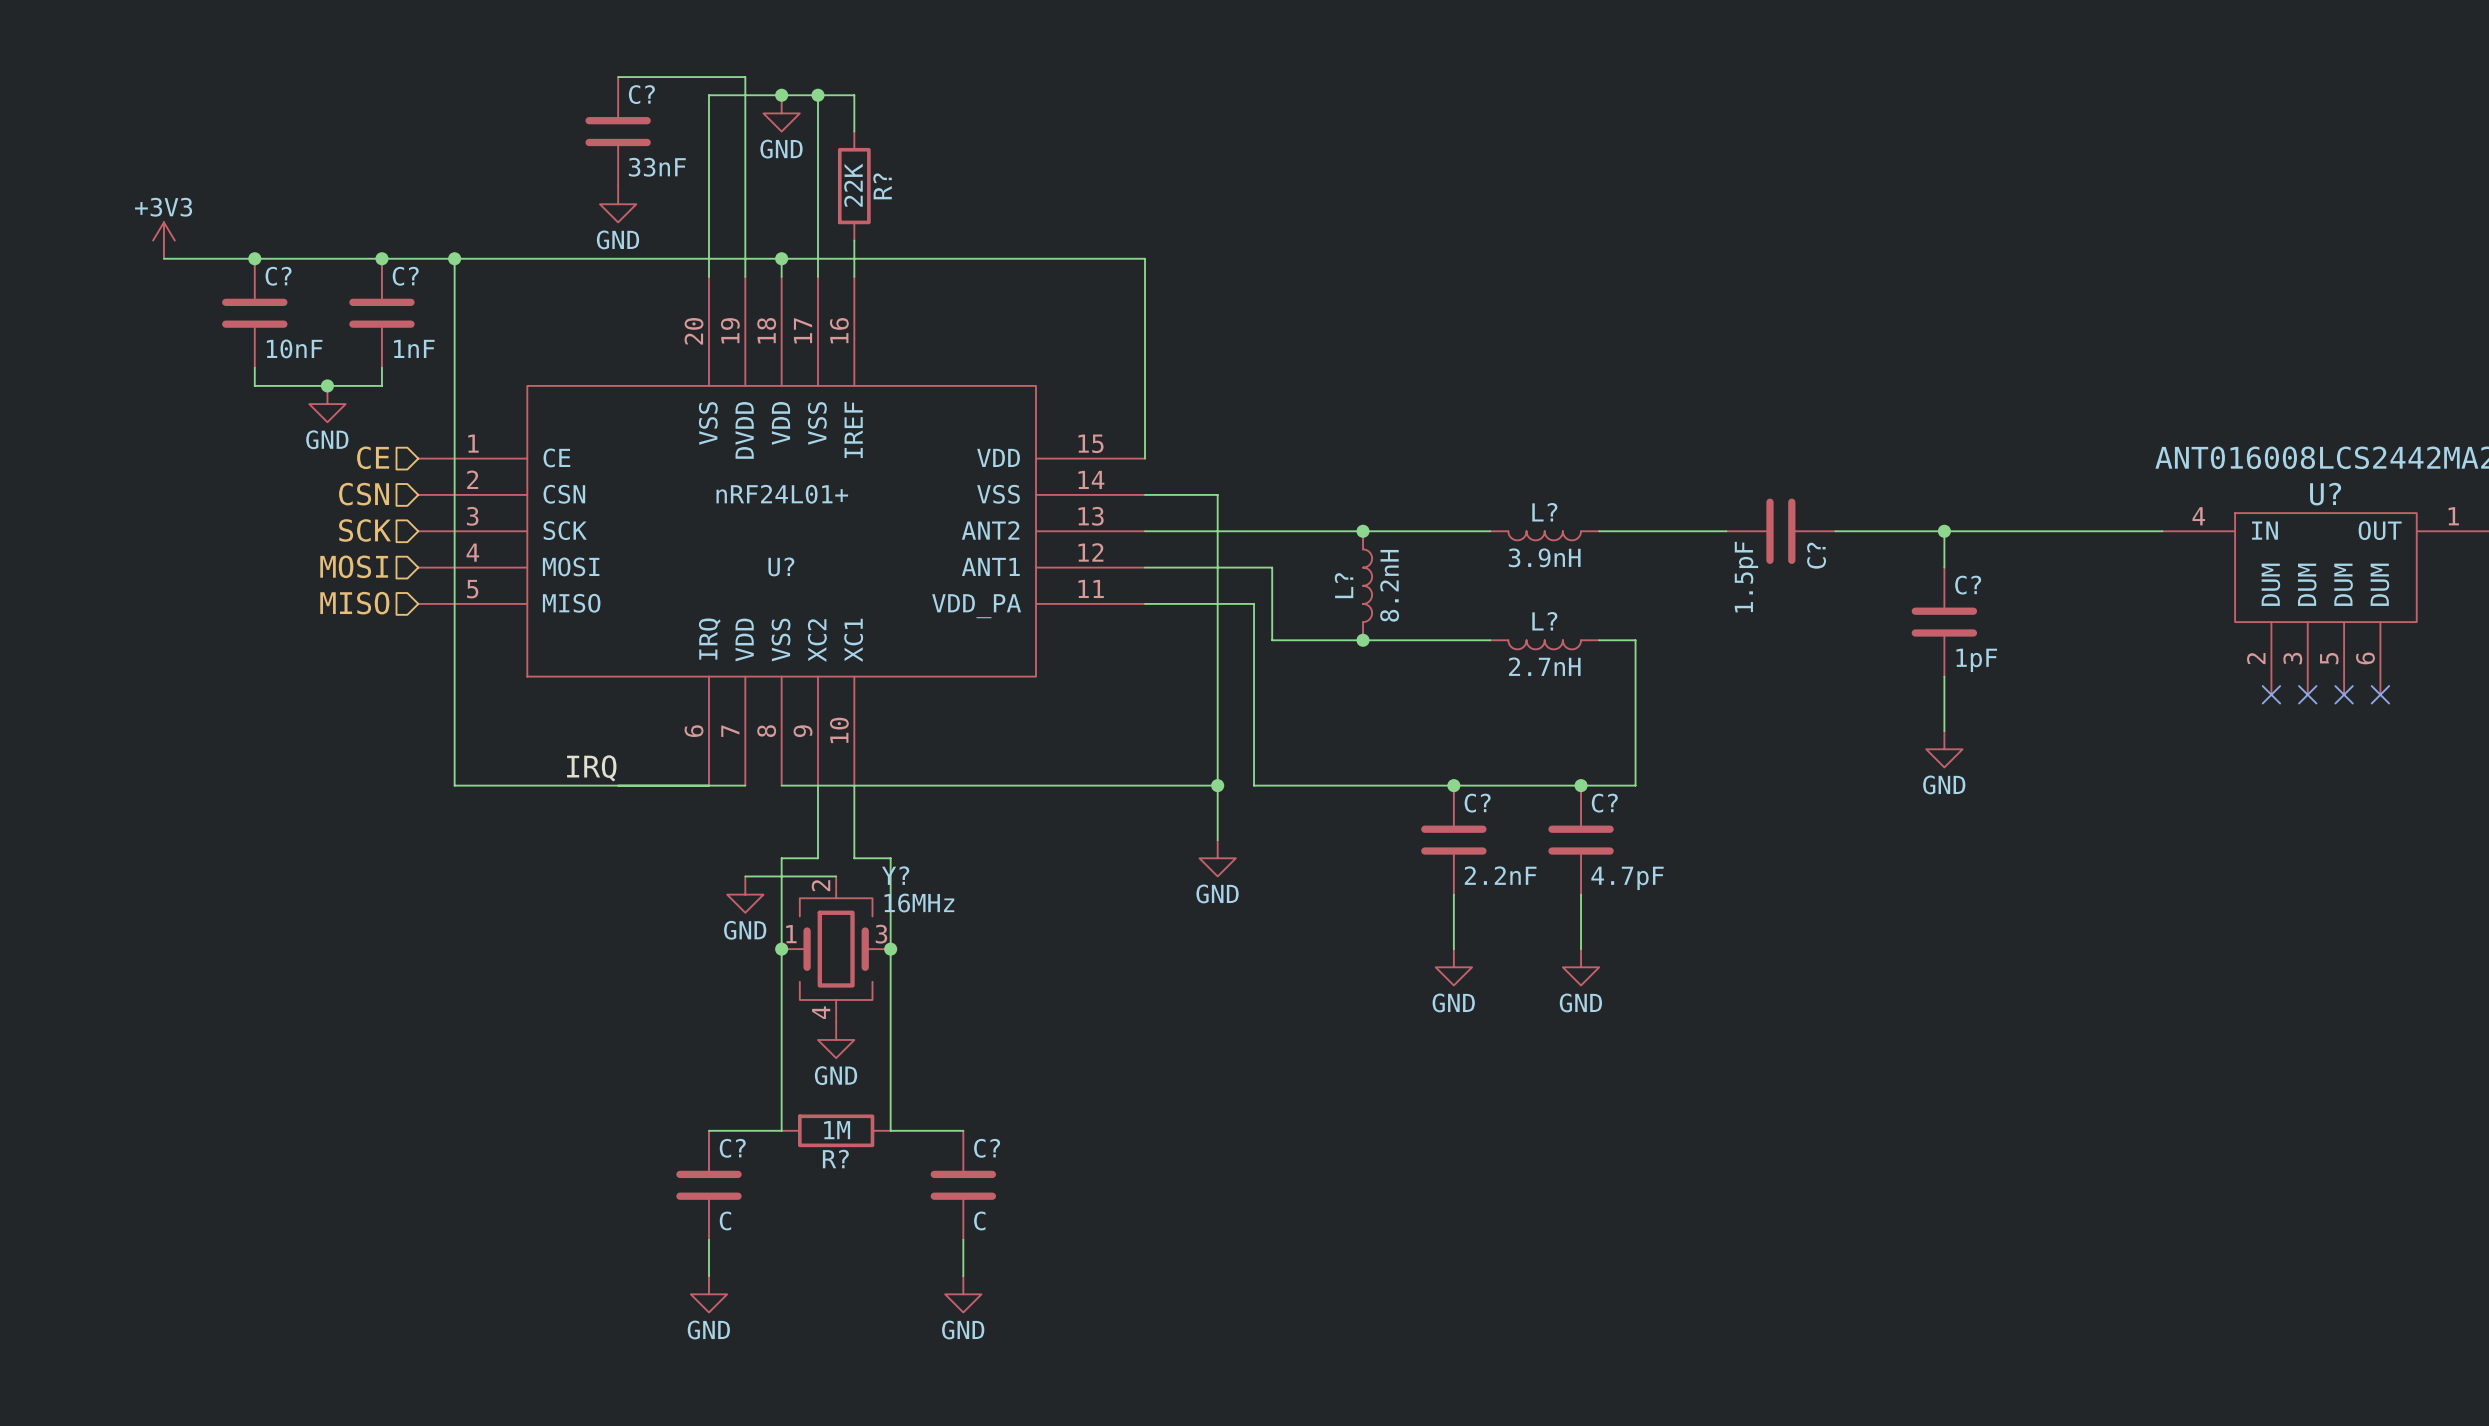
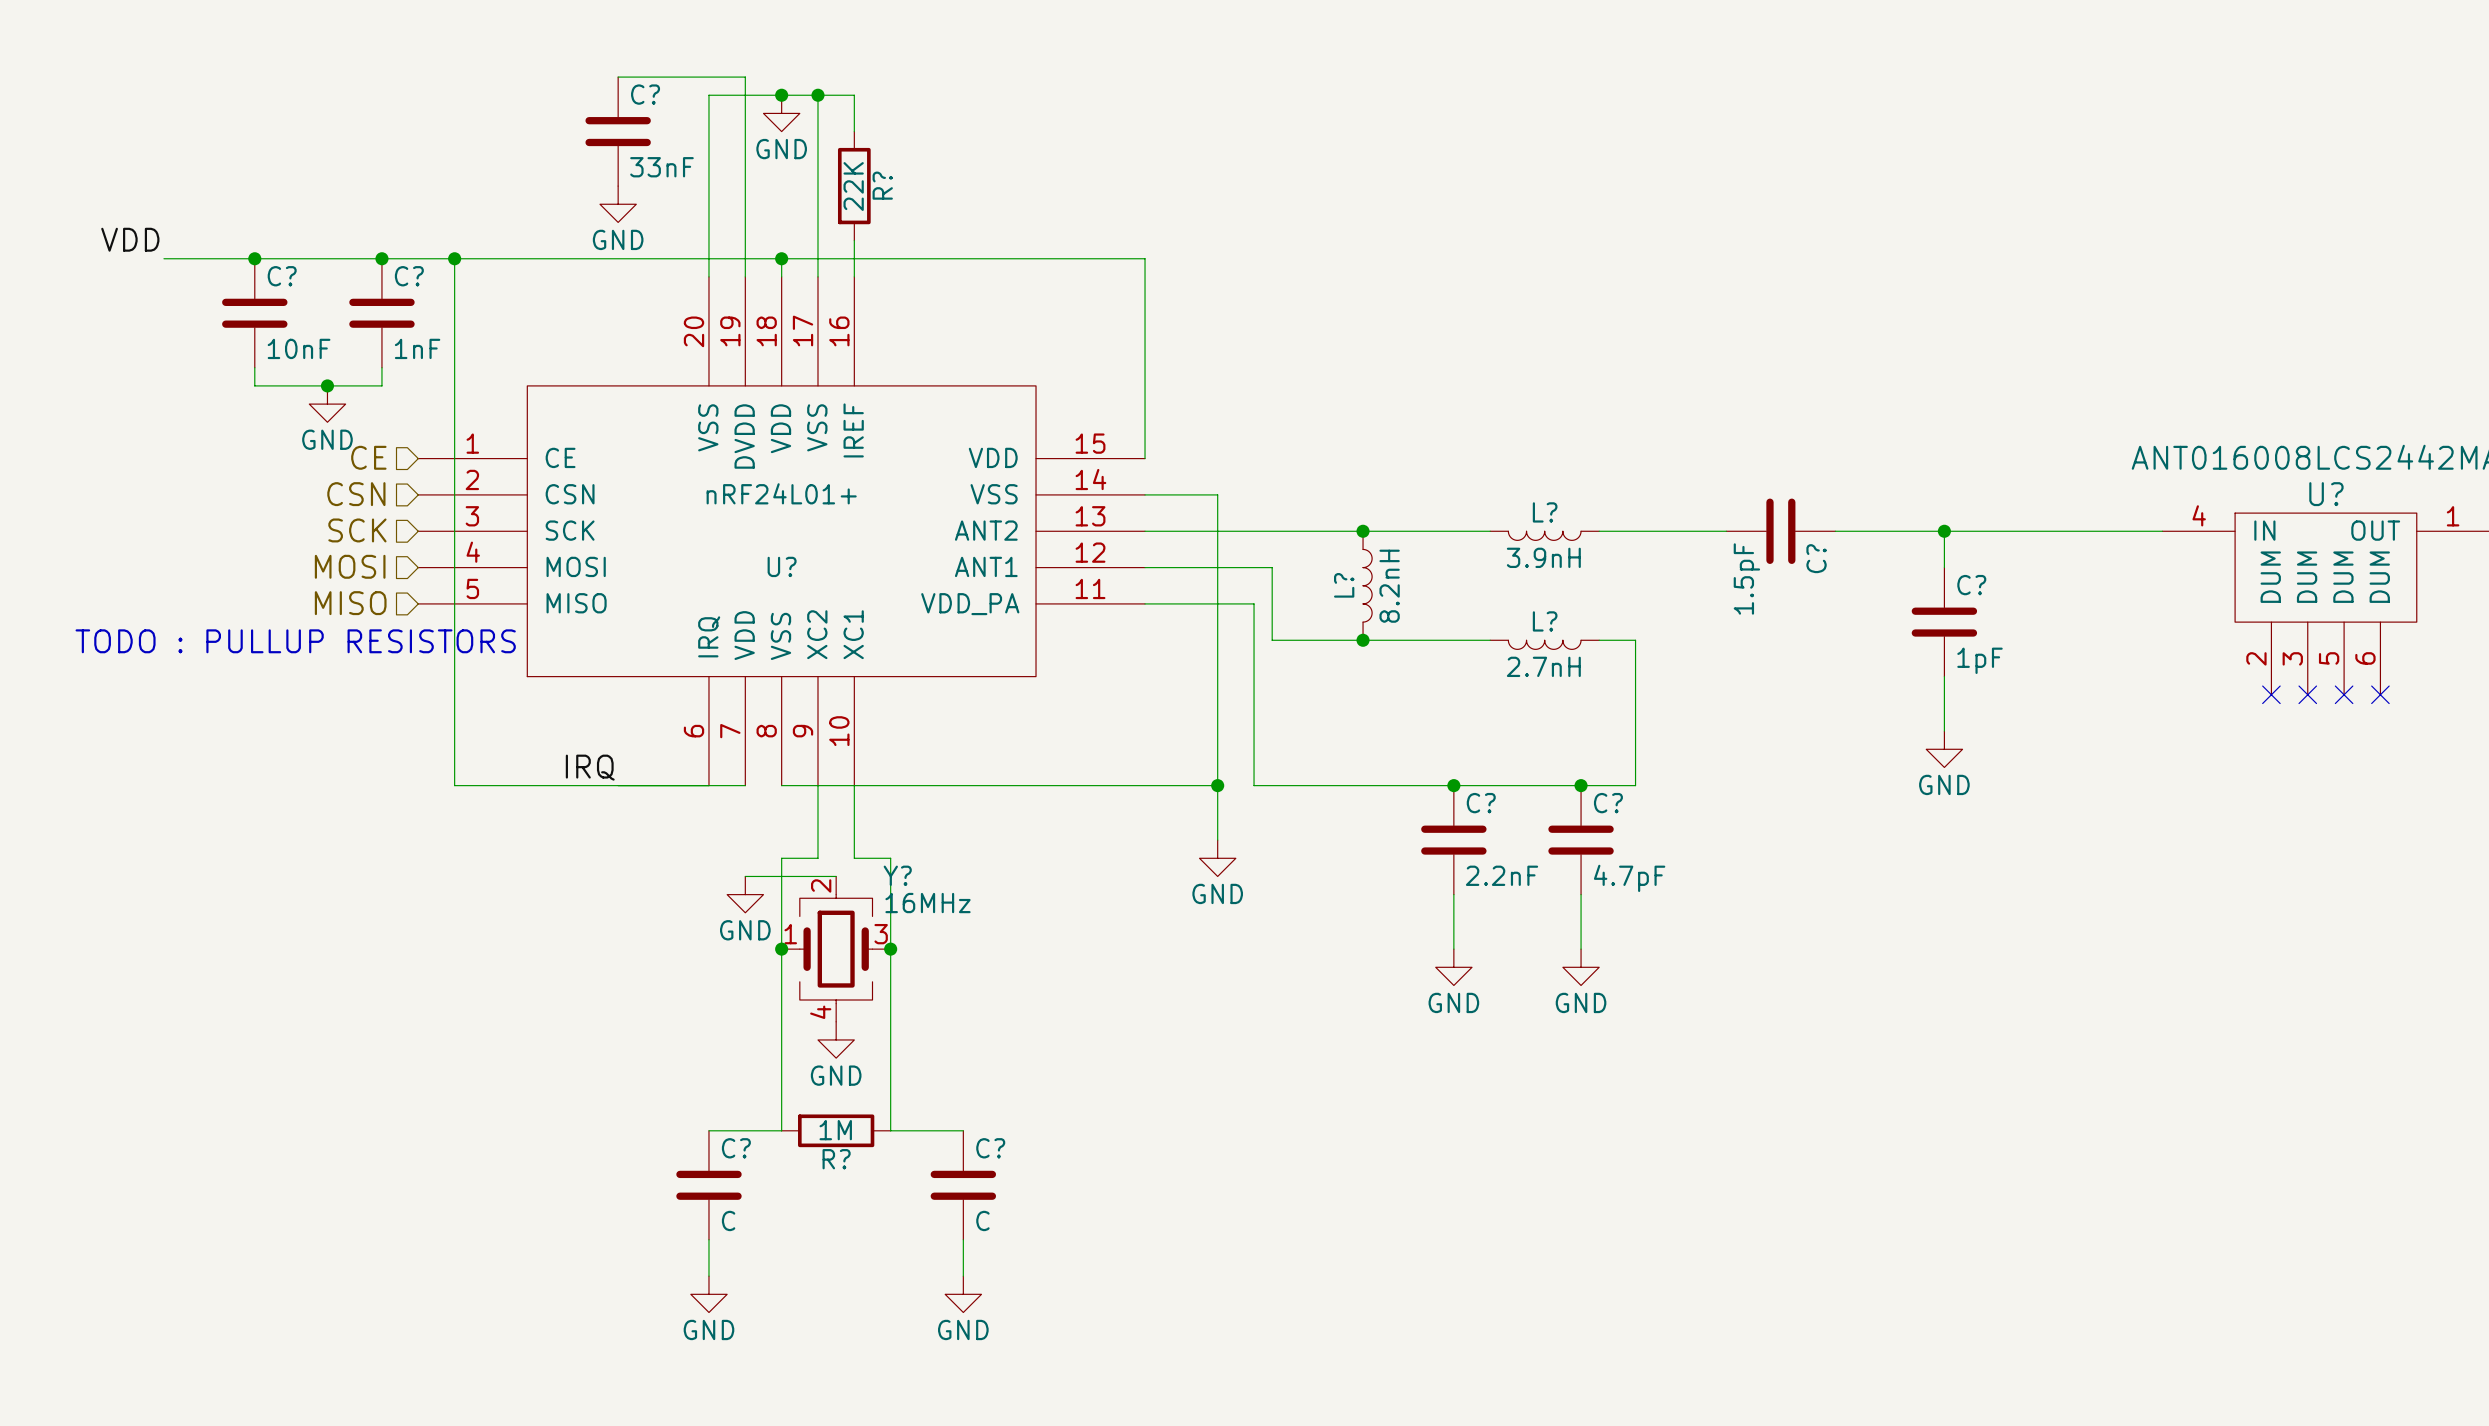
label: none -> VDD (130, 239)
power symbol: +3V3 (163, 240) -> none
text: none -> TODO : PULLUP RESISTORS (295, 641)

